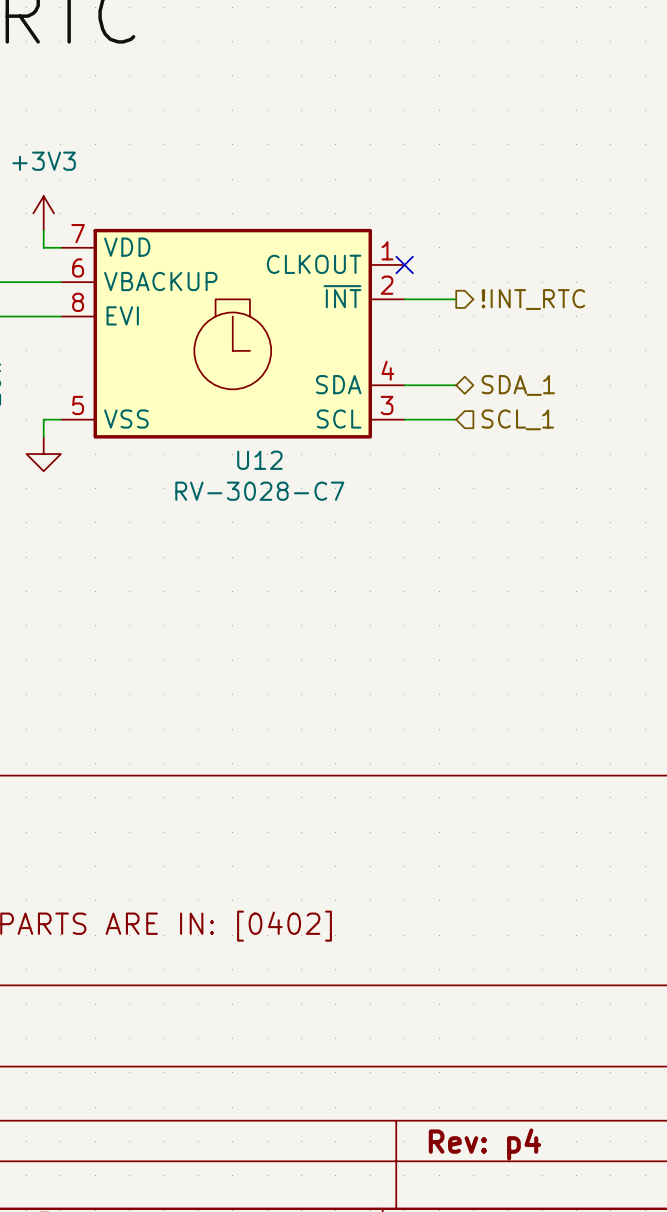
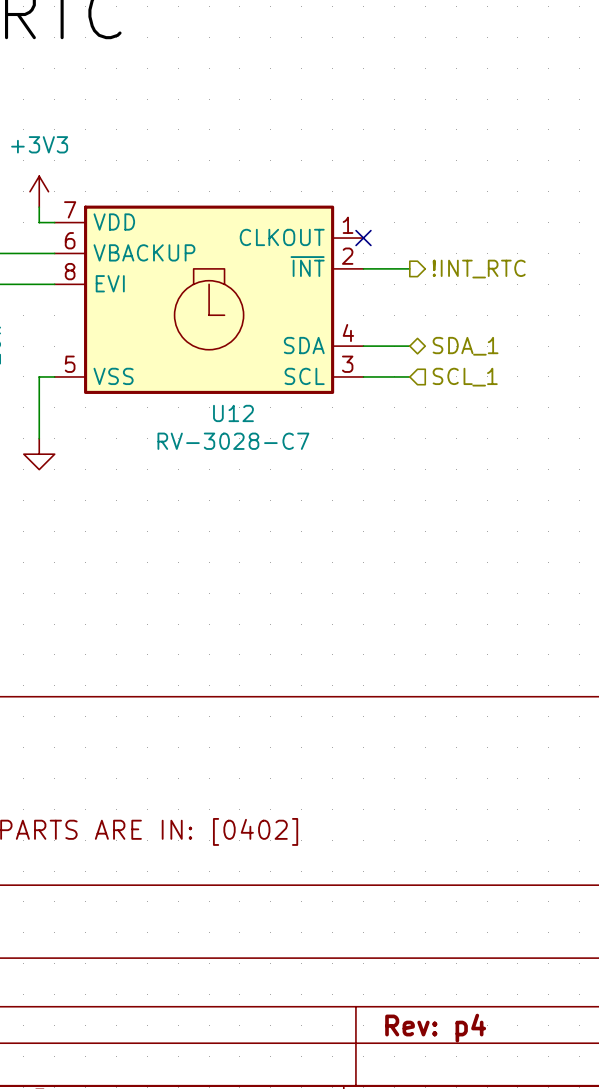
wire: none -> (39, 392) (39, 438)
power symbol position: (43, 454) -> (39, 454)

